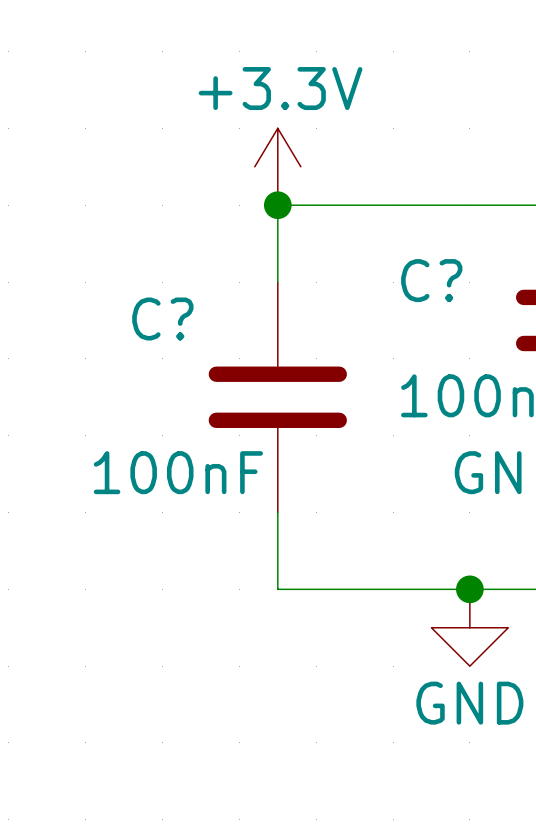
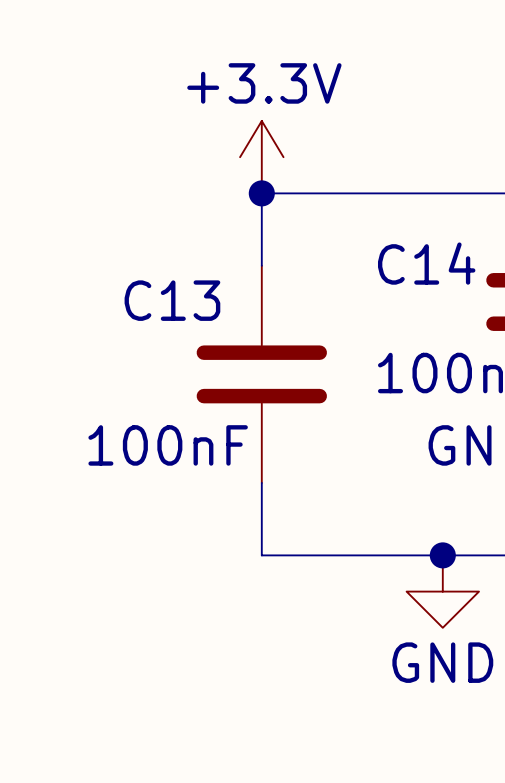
C? name: C? (431, 280) -> C14 (426, 263)
C? name: C? (162, 319) -> C13 (172, 300)

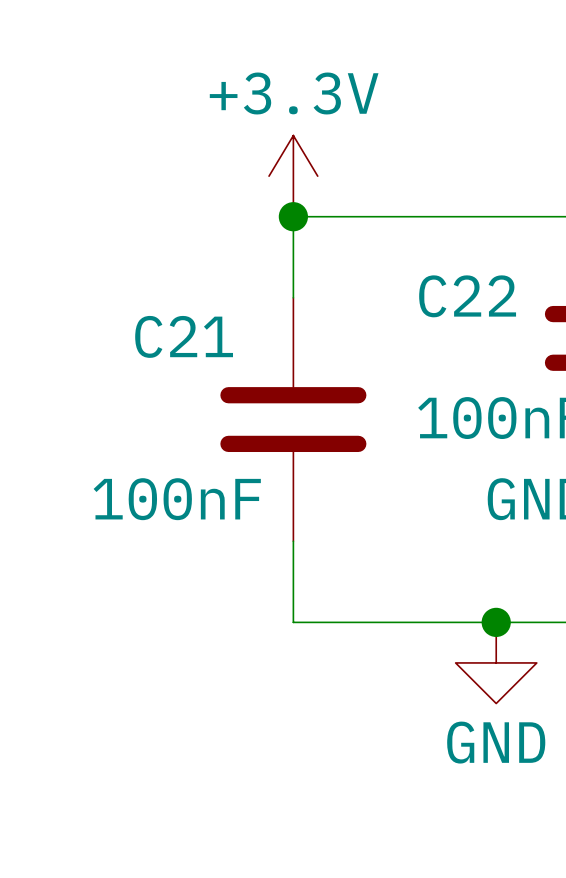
C14 name: C14 (426, 263) -> C22 (467, 296)
C13 name: C13 (172, 300) -> C21 (184, 336)

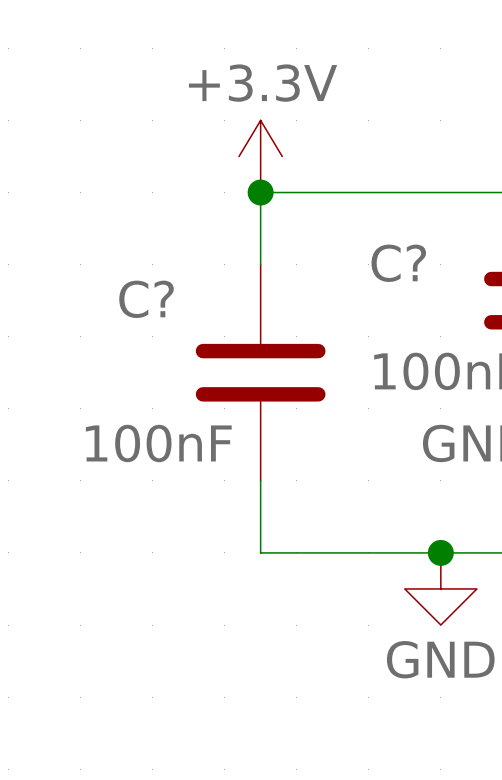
C22 name: C22 (467, 296) -> C? (398, 263)
C21 name: C21 (184, 336) -> C? (146, 299)

